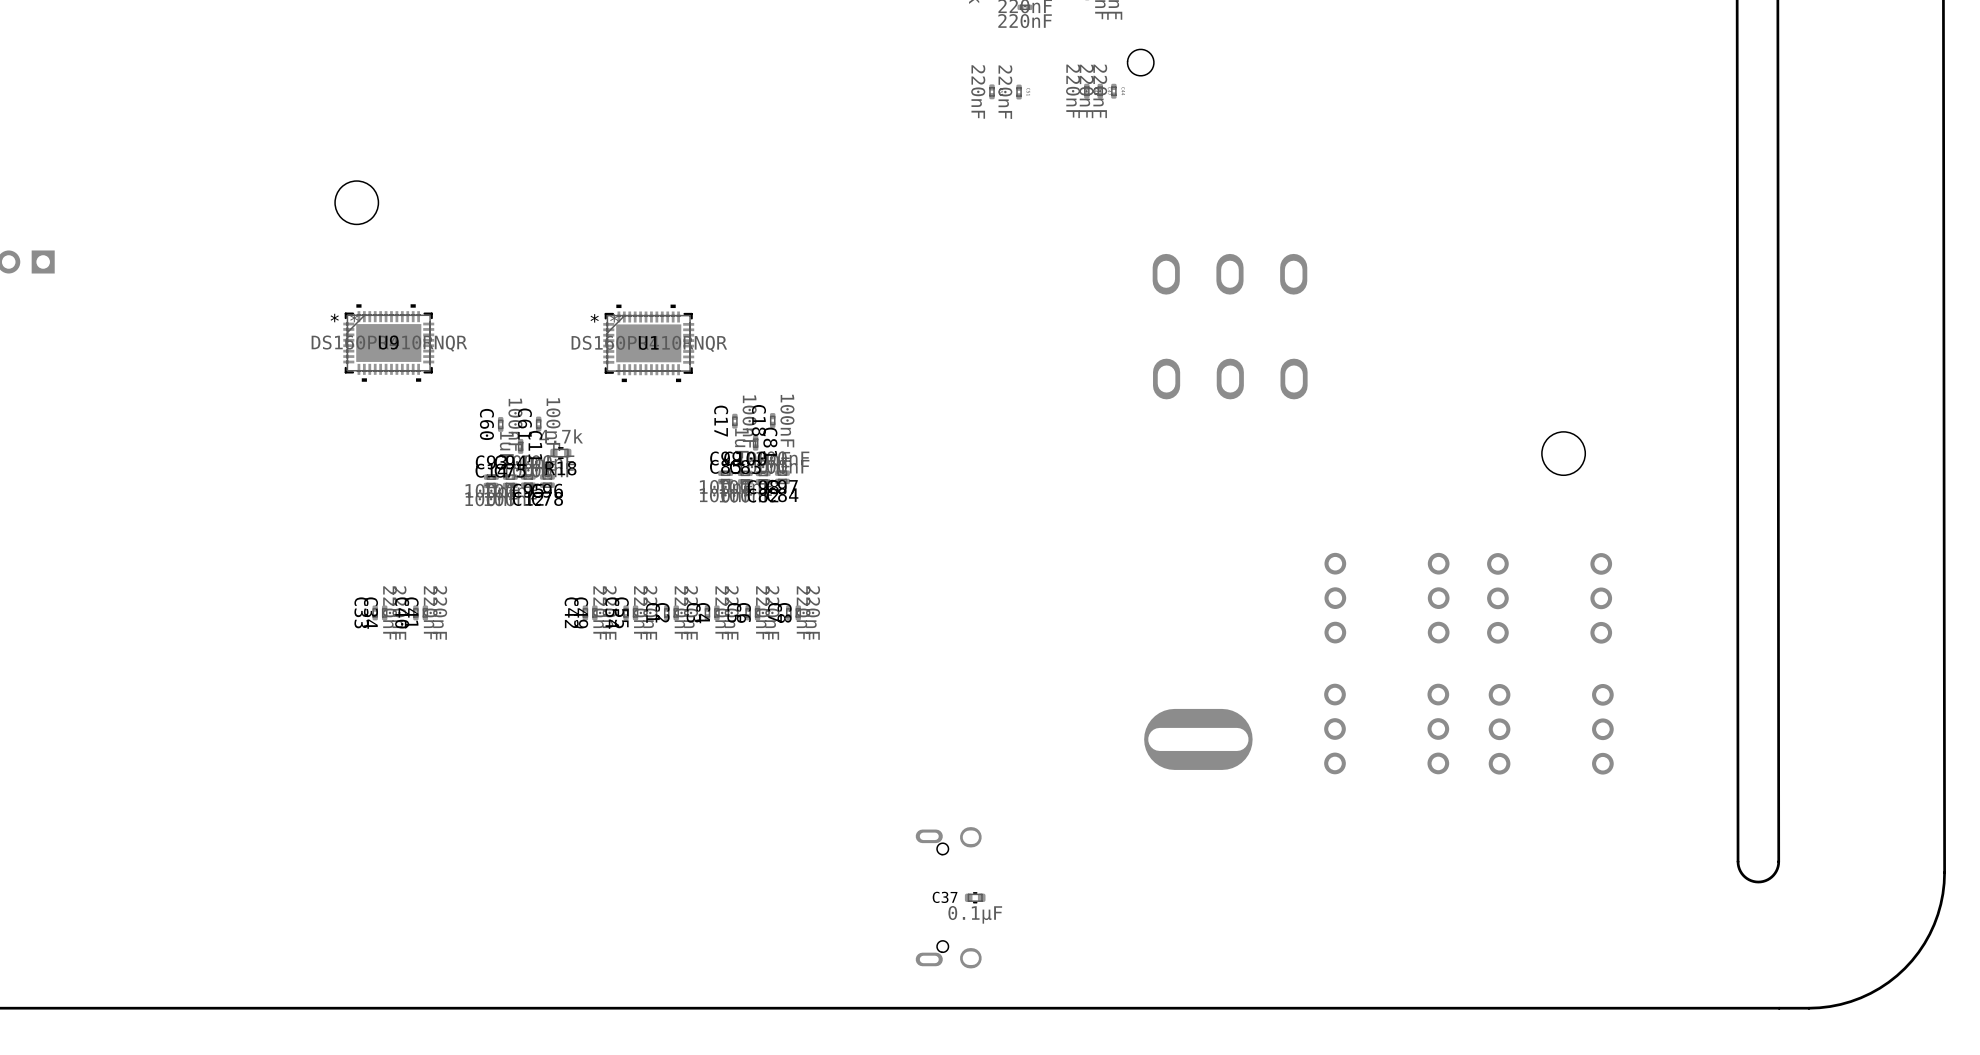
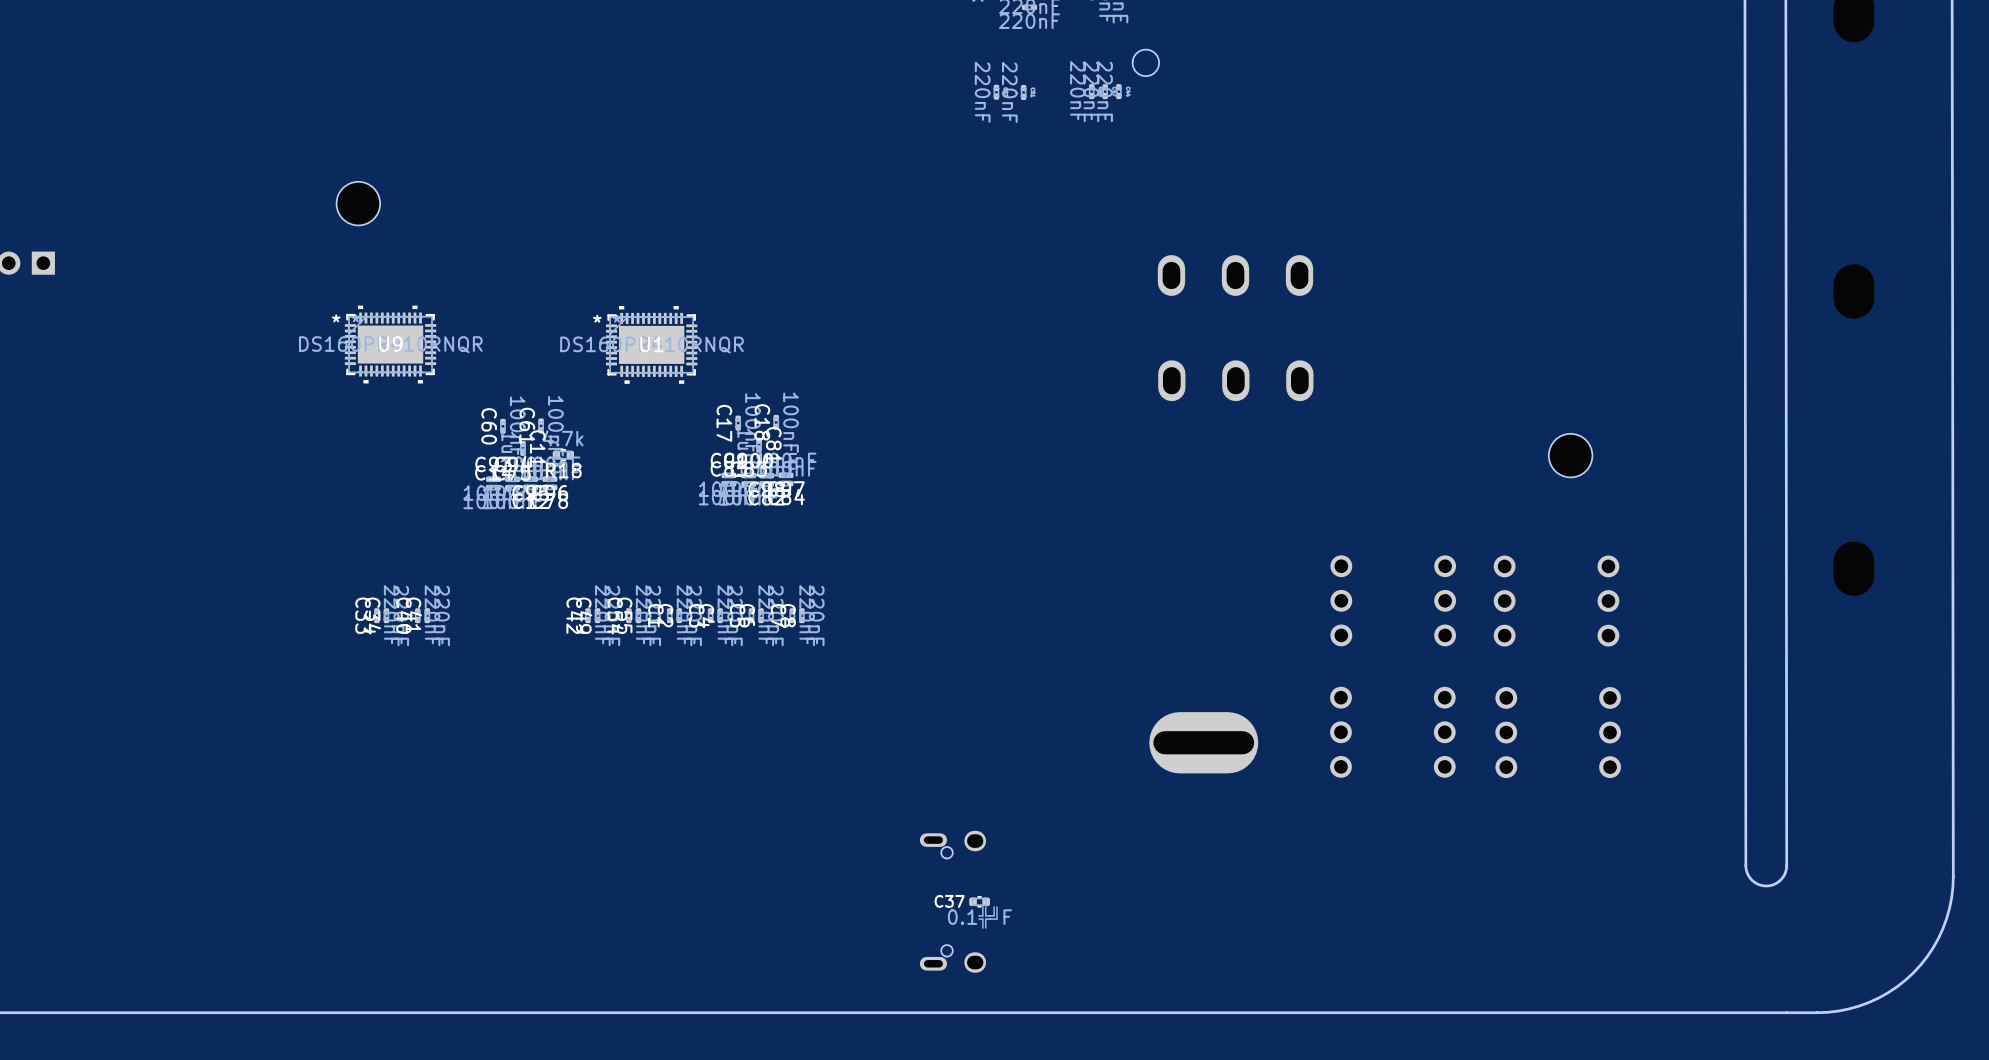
C37 value: 0.1μF (975, 914) -> 0.1╬╝F (979, 917)

